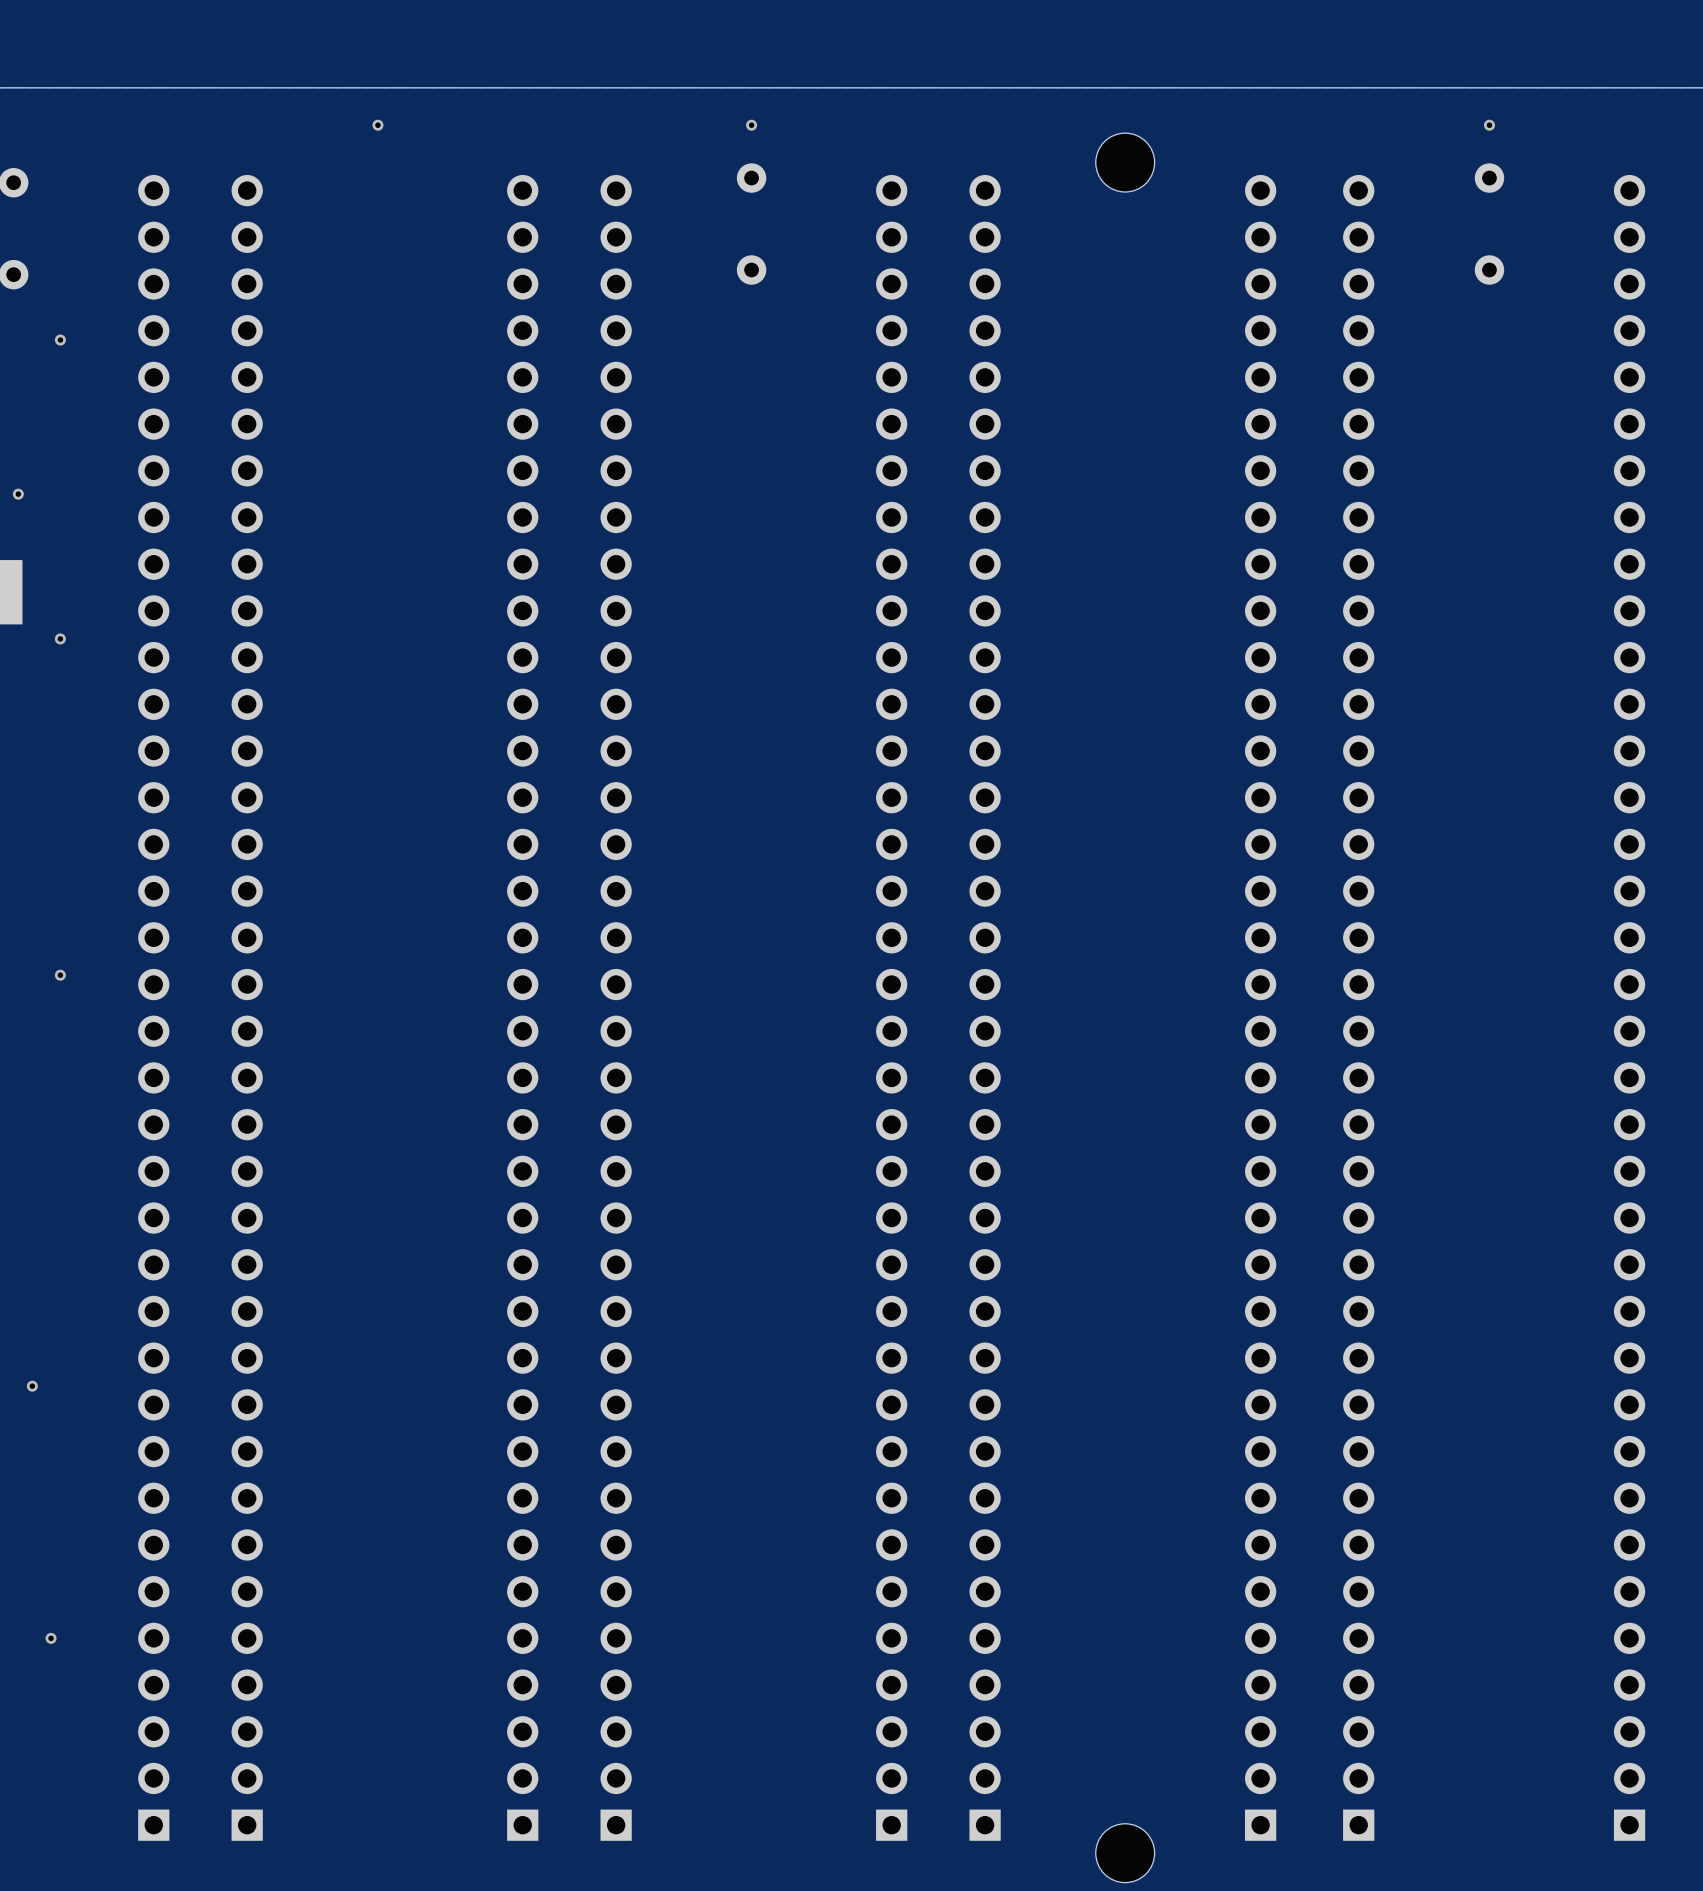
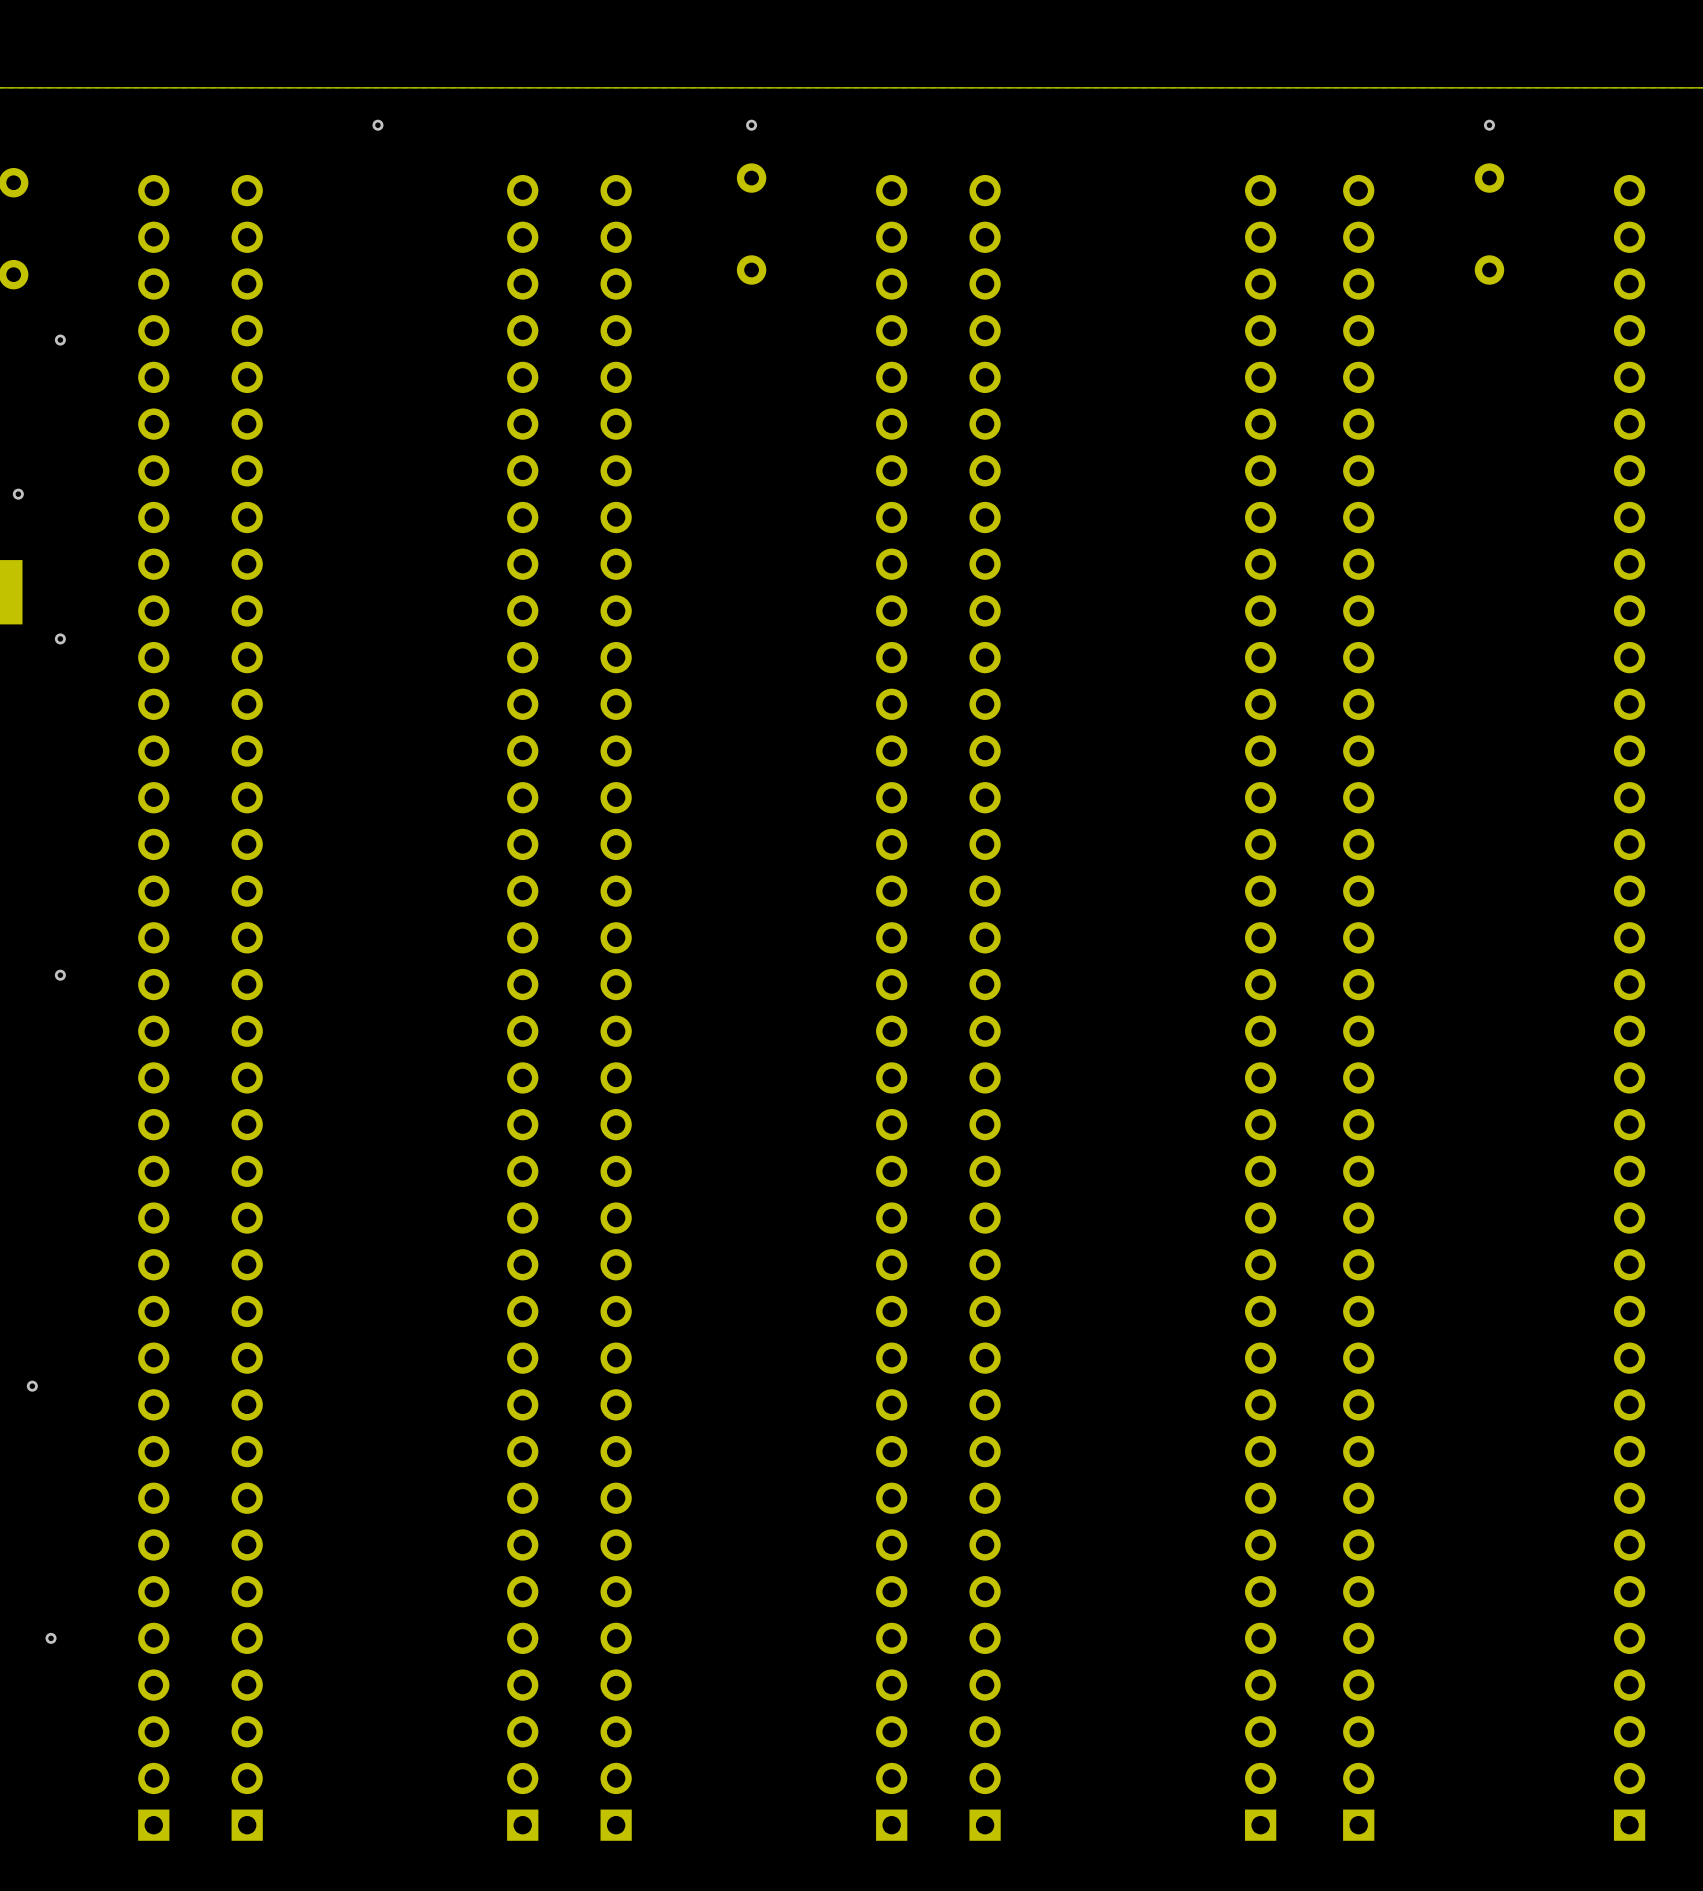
part: (1125, 162) -> none
part: (1125, 1853) -> none

